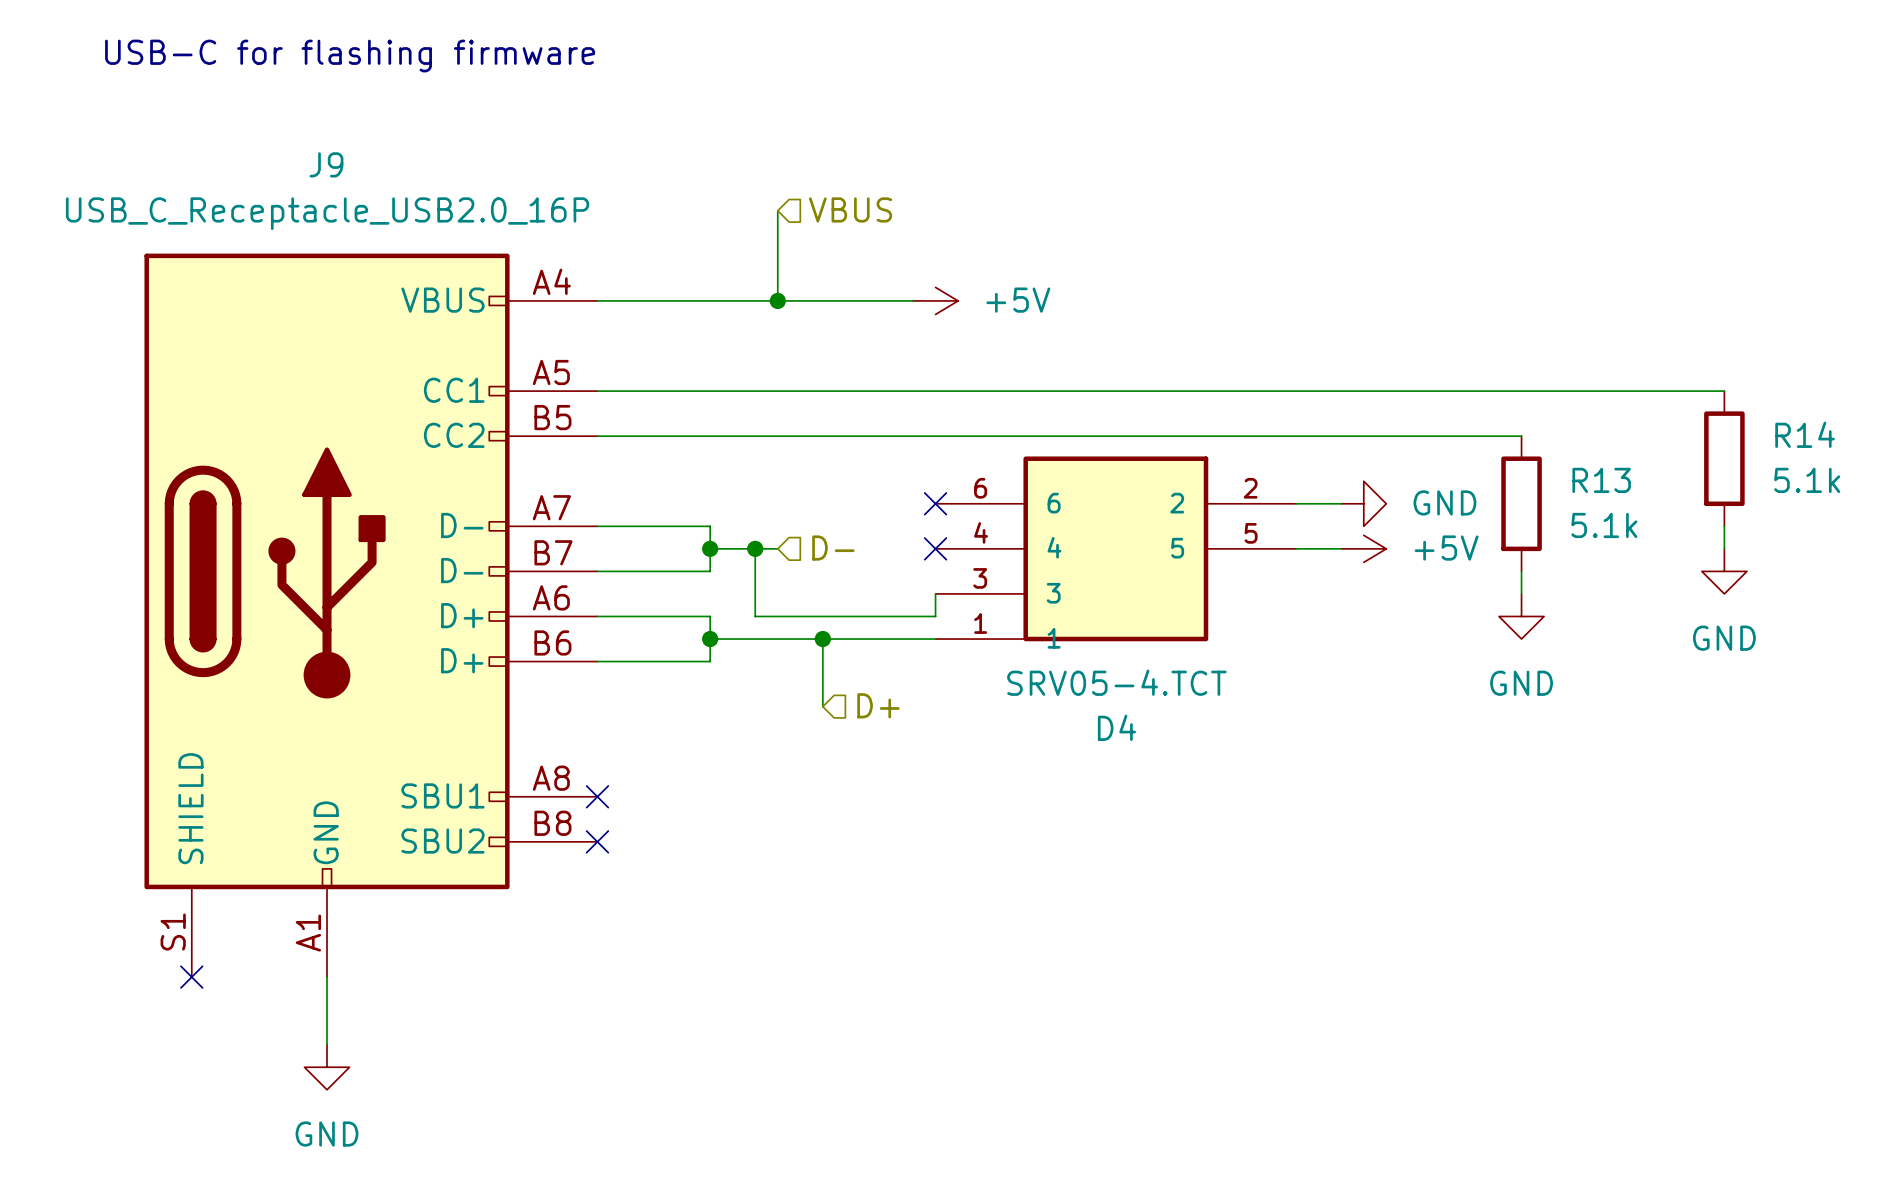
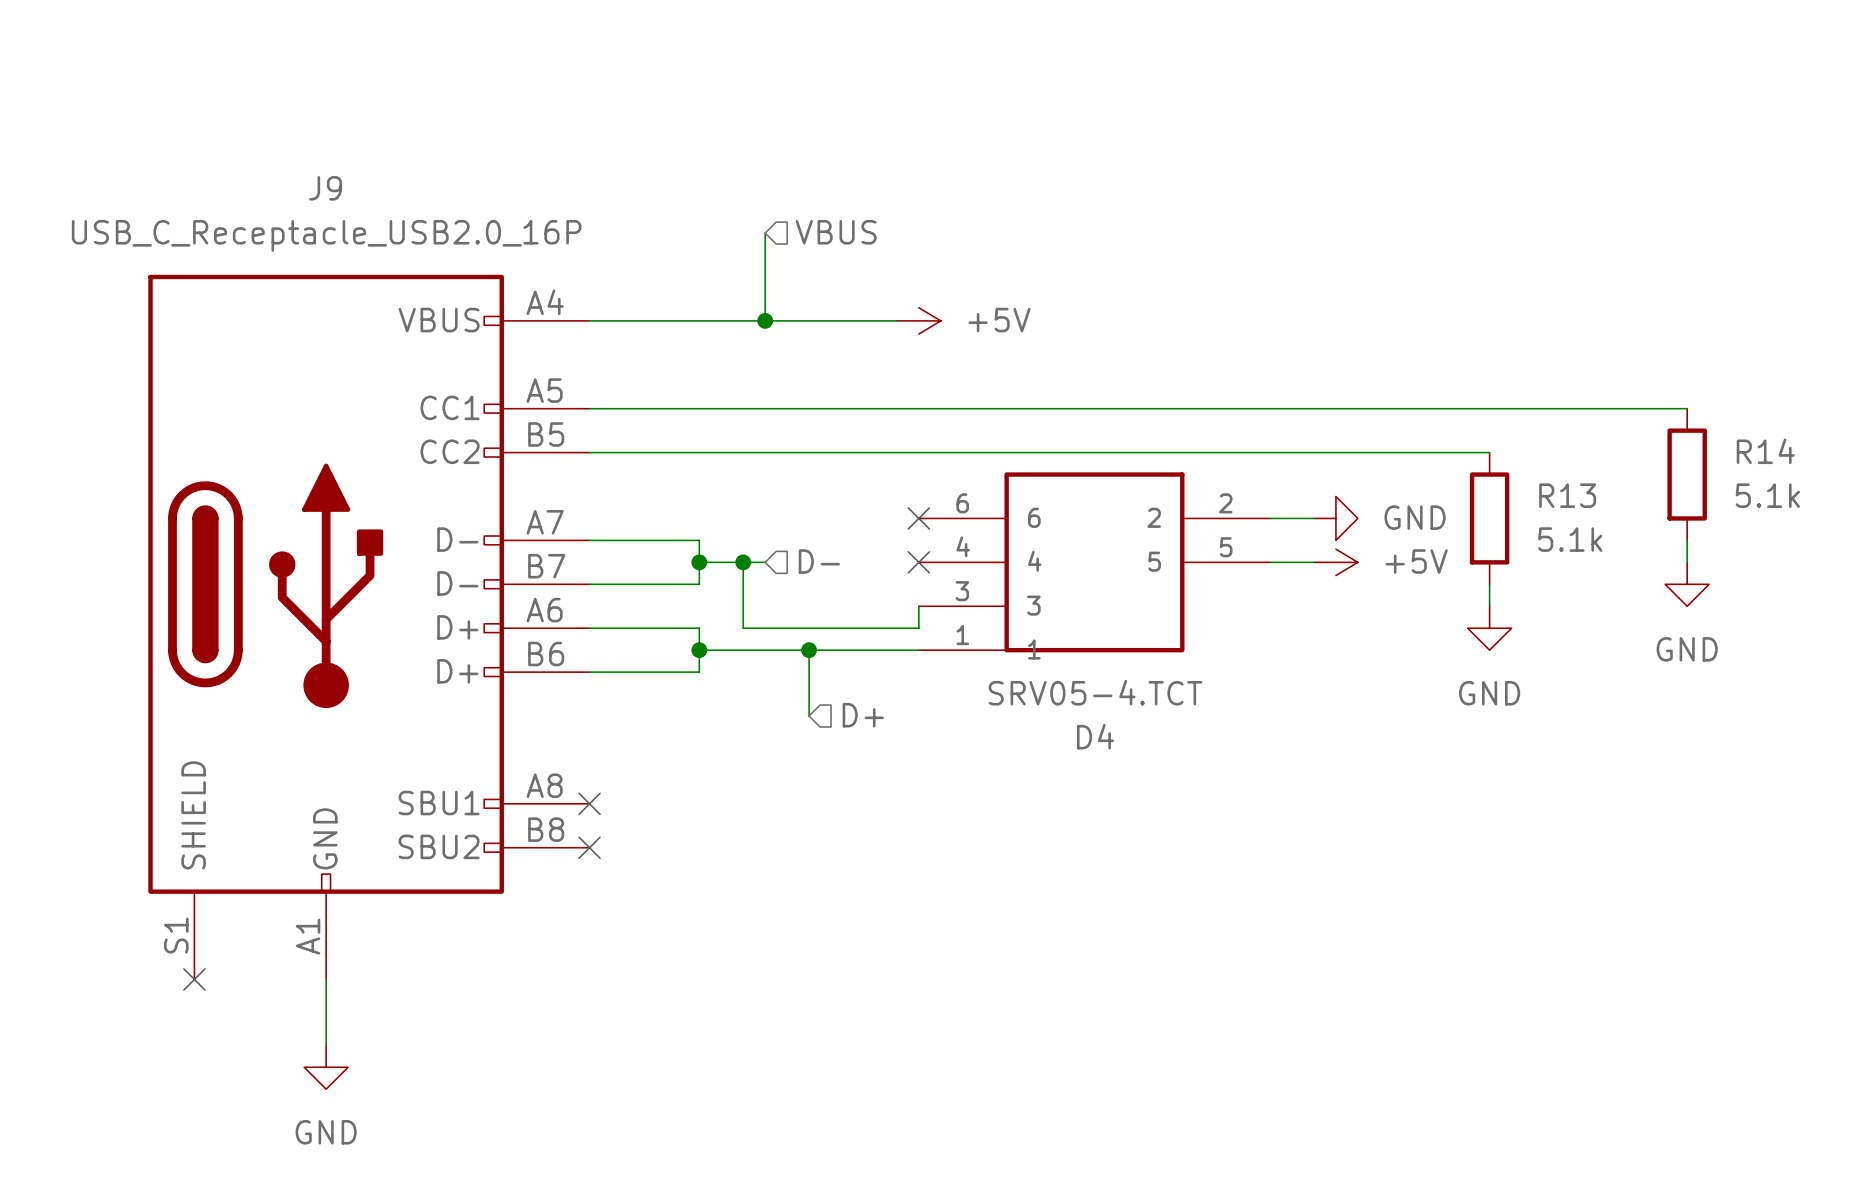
text: USB-C for flashing firmware (350, 56) -> none

